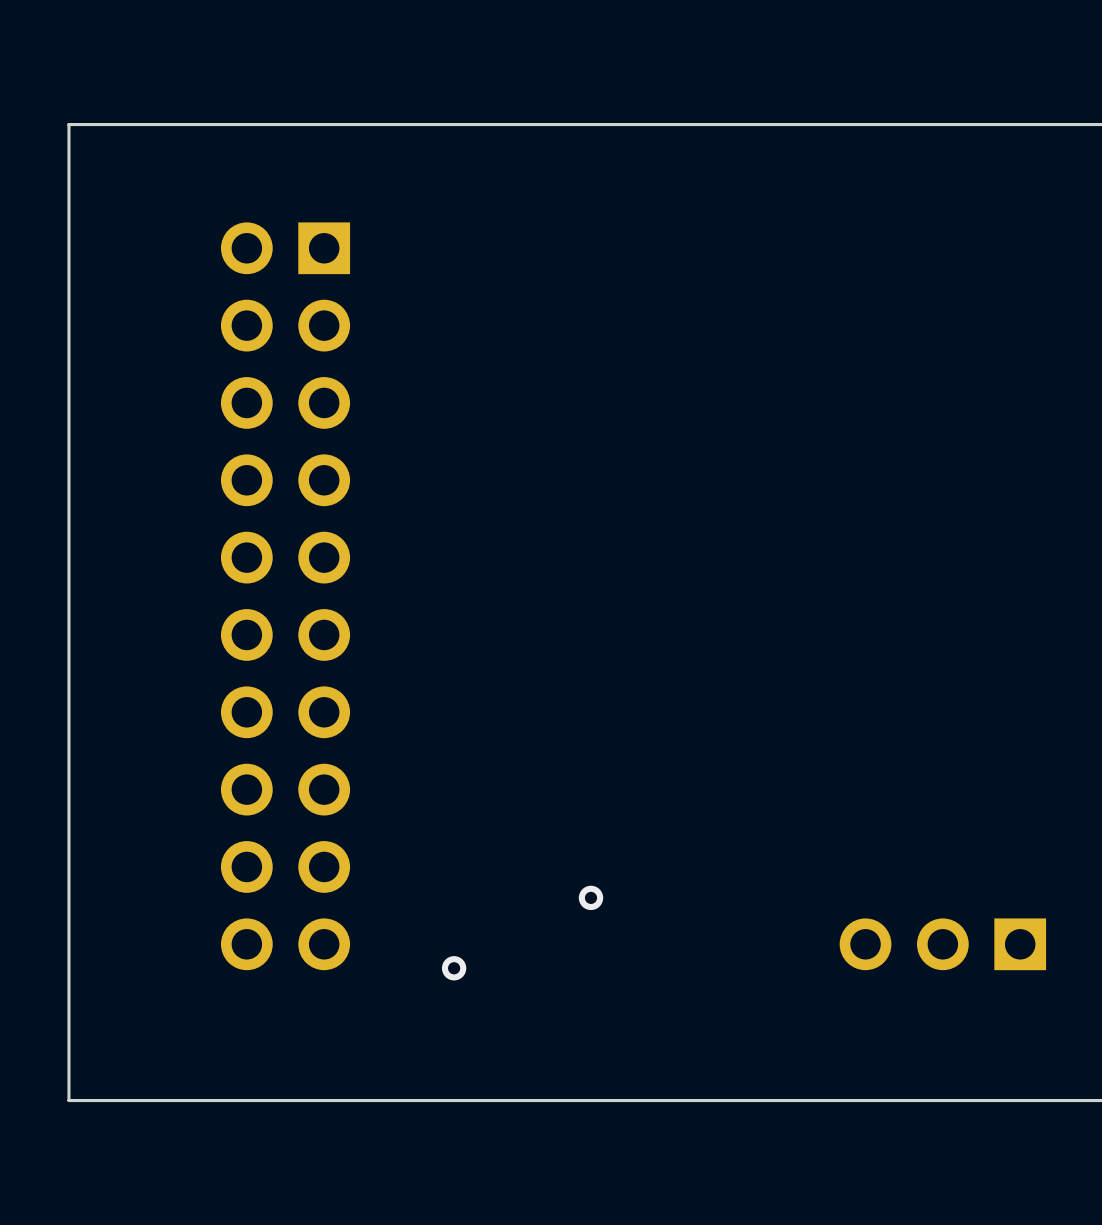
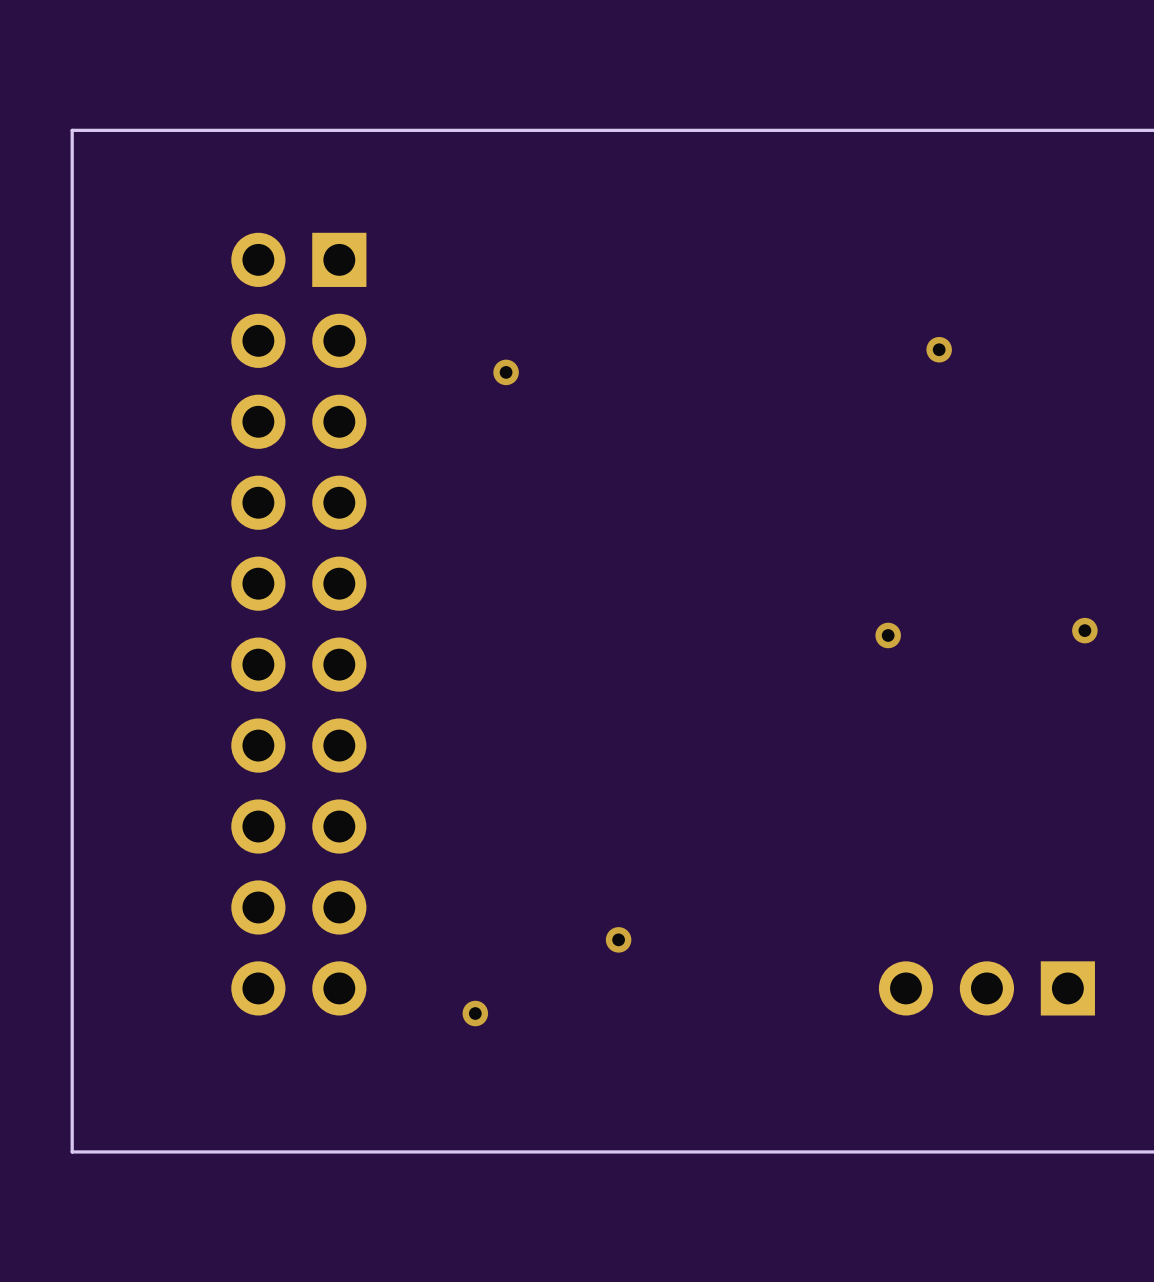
via: none -> (939, 349)
via: none -> (506, 372)
via: none -> (1084, 630)
via: none -> (888, 635)

